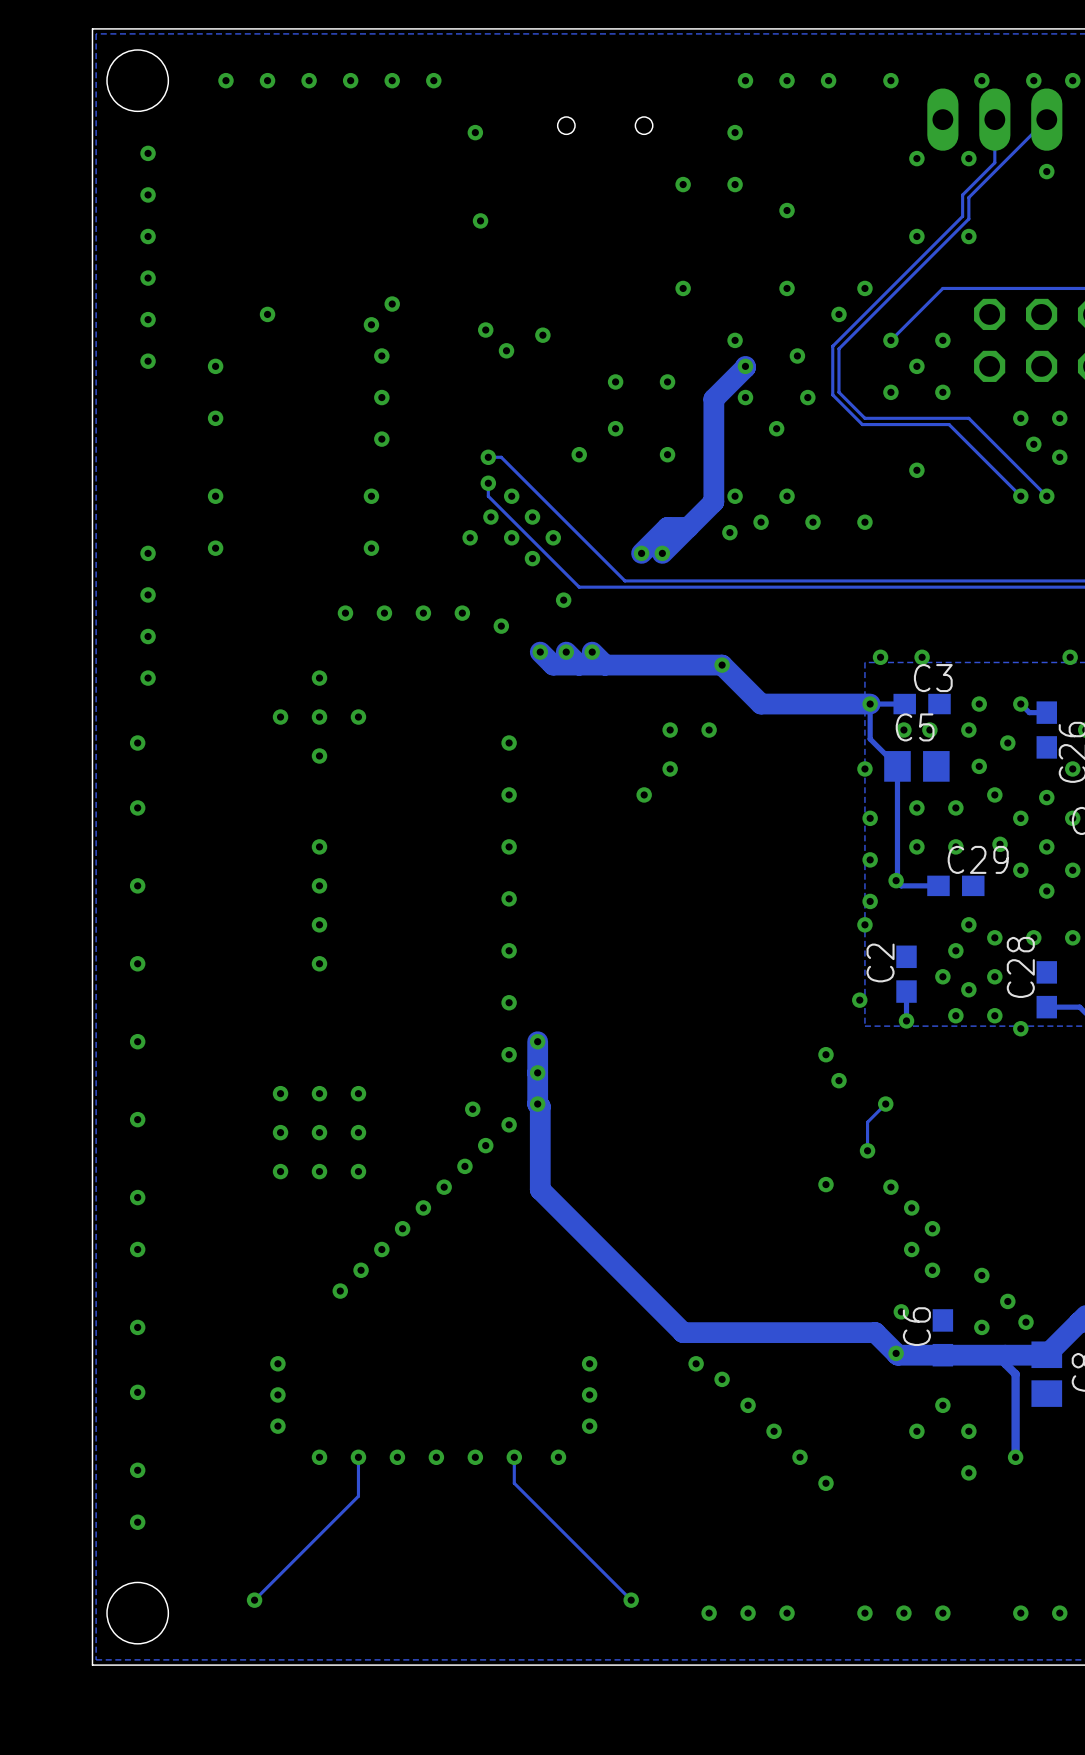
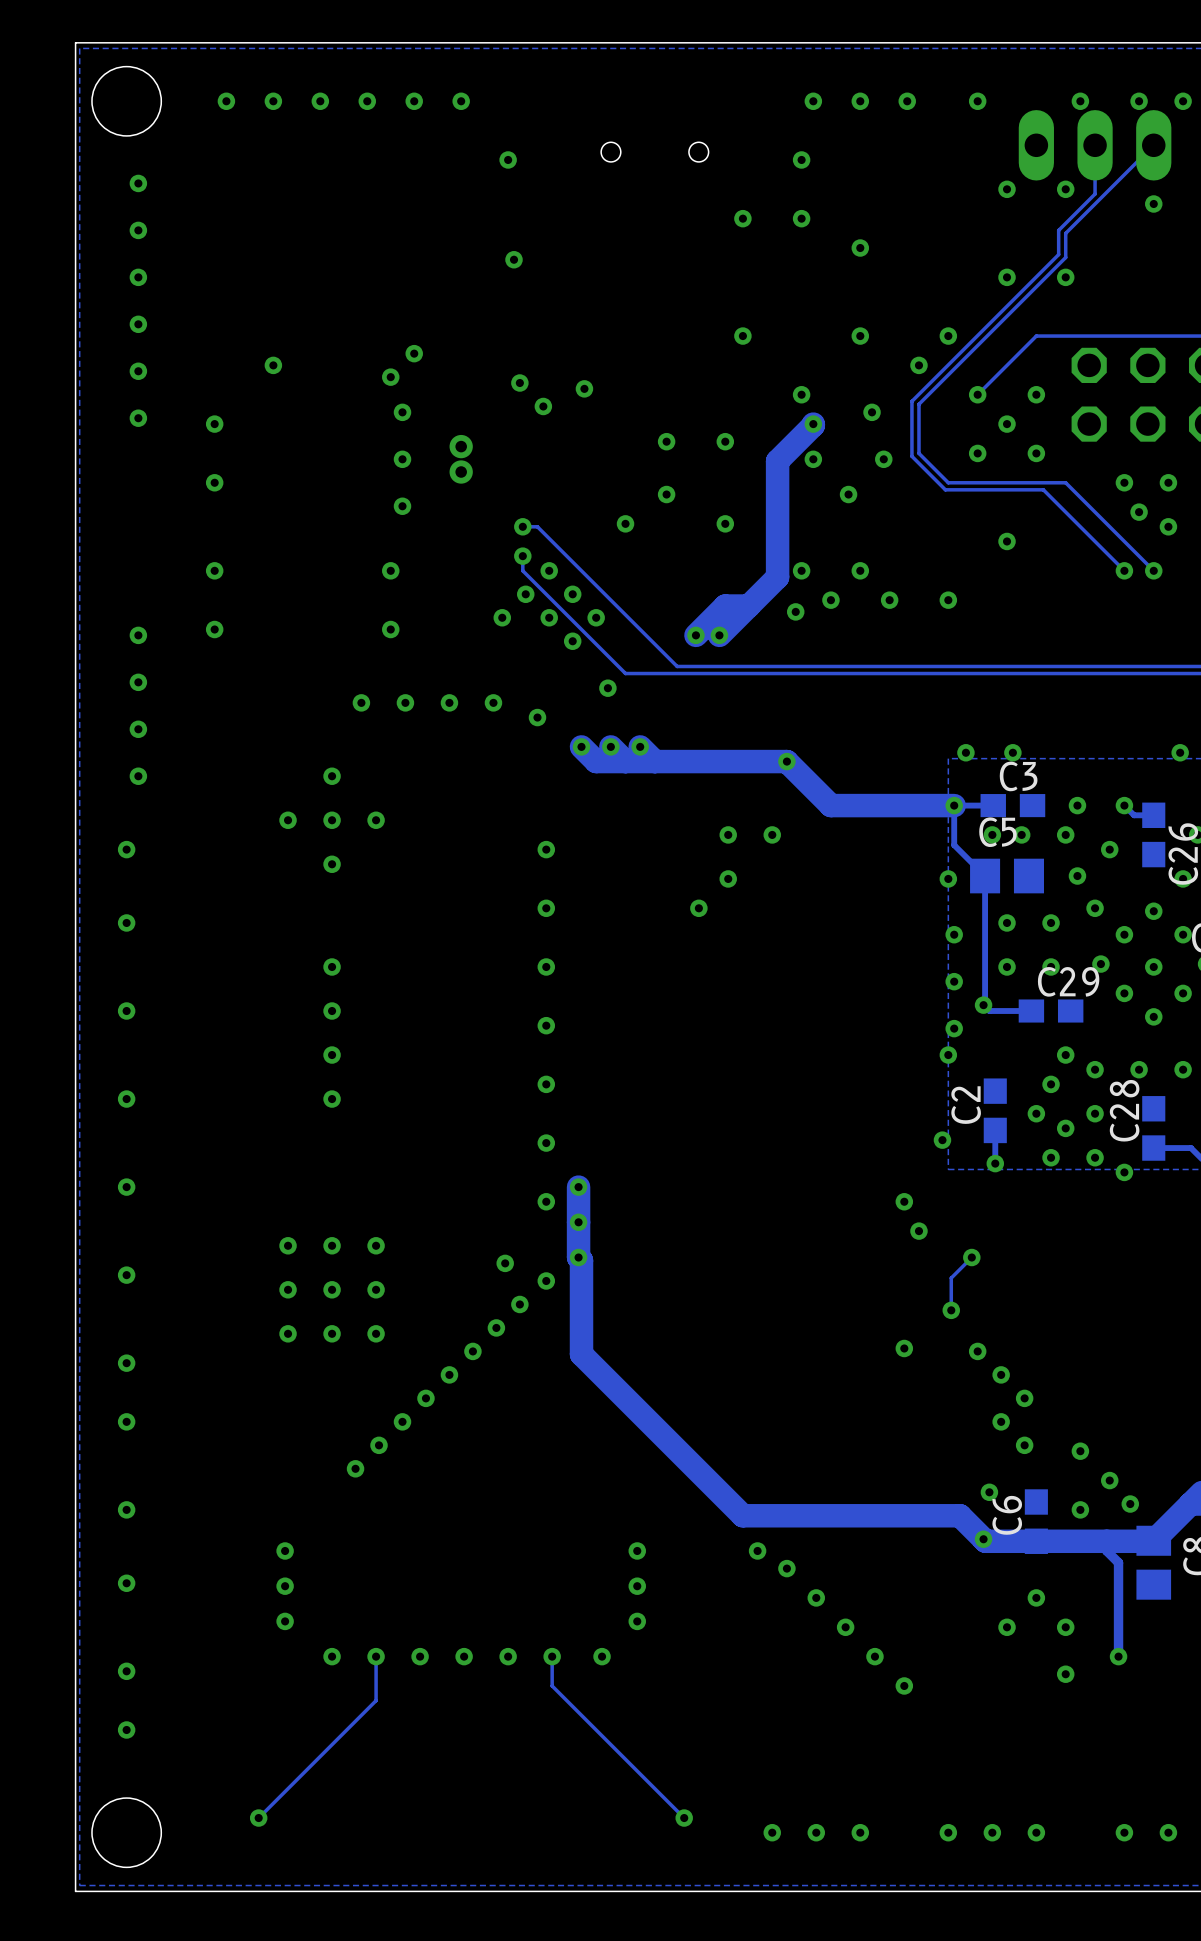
part: none -> (461, 459)

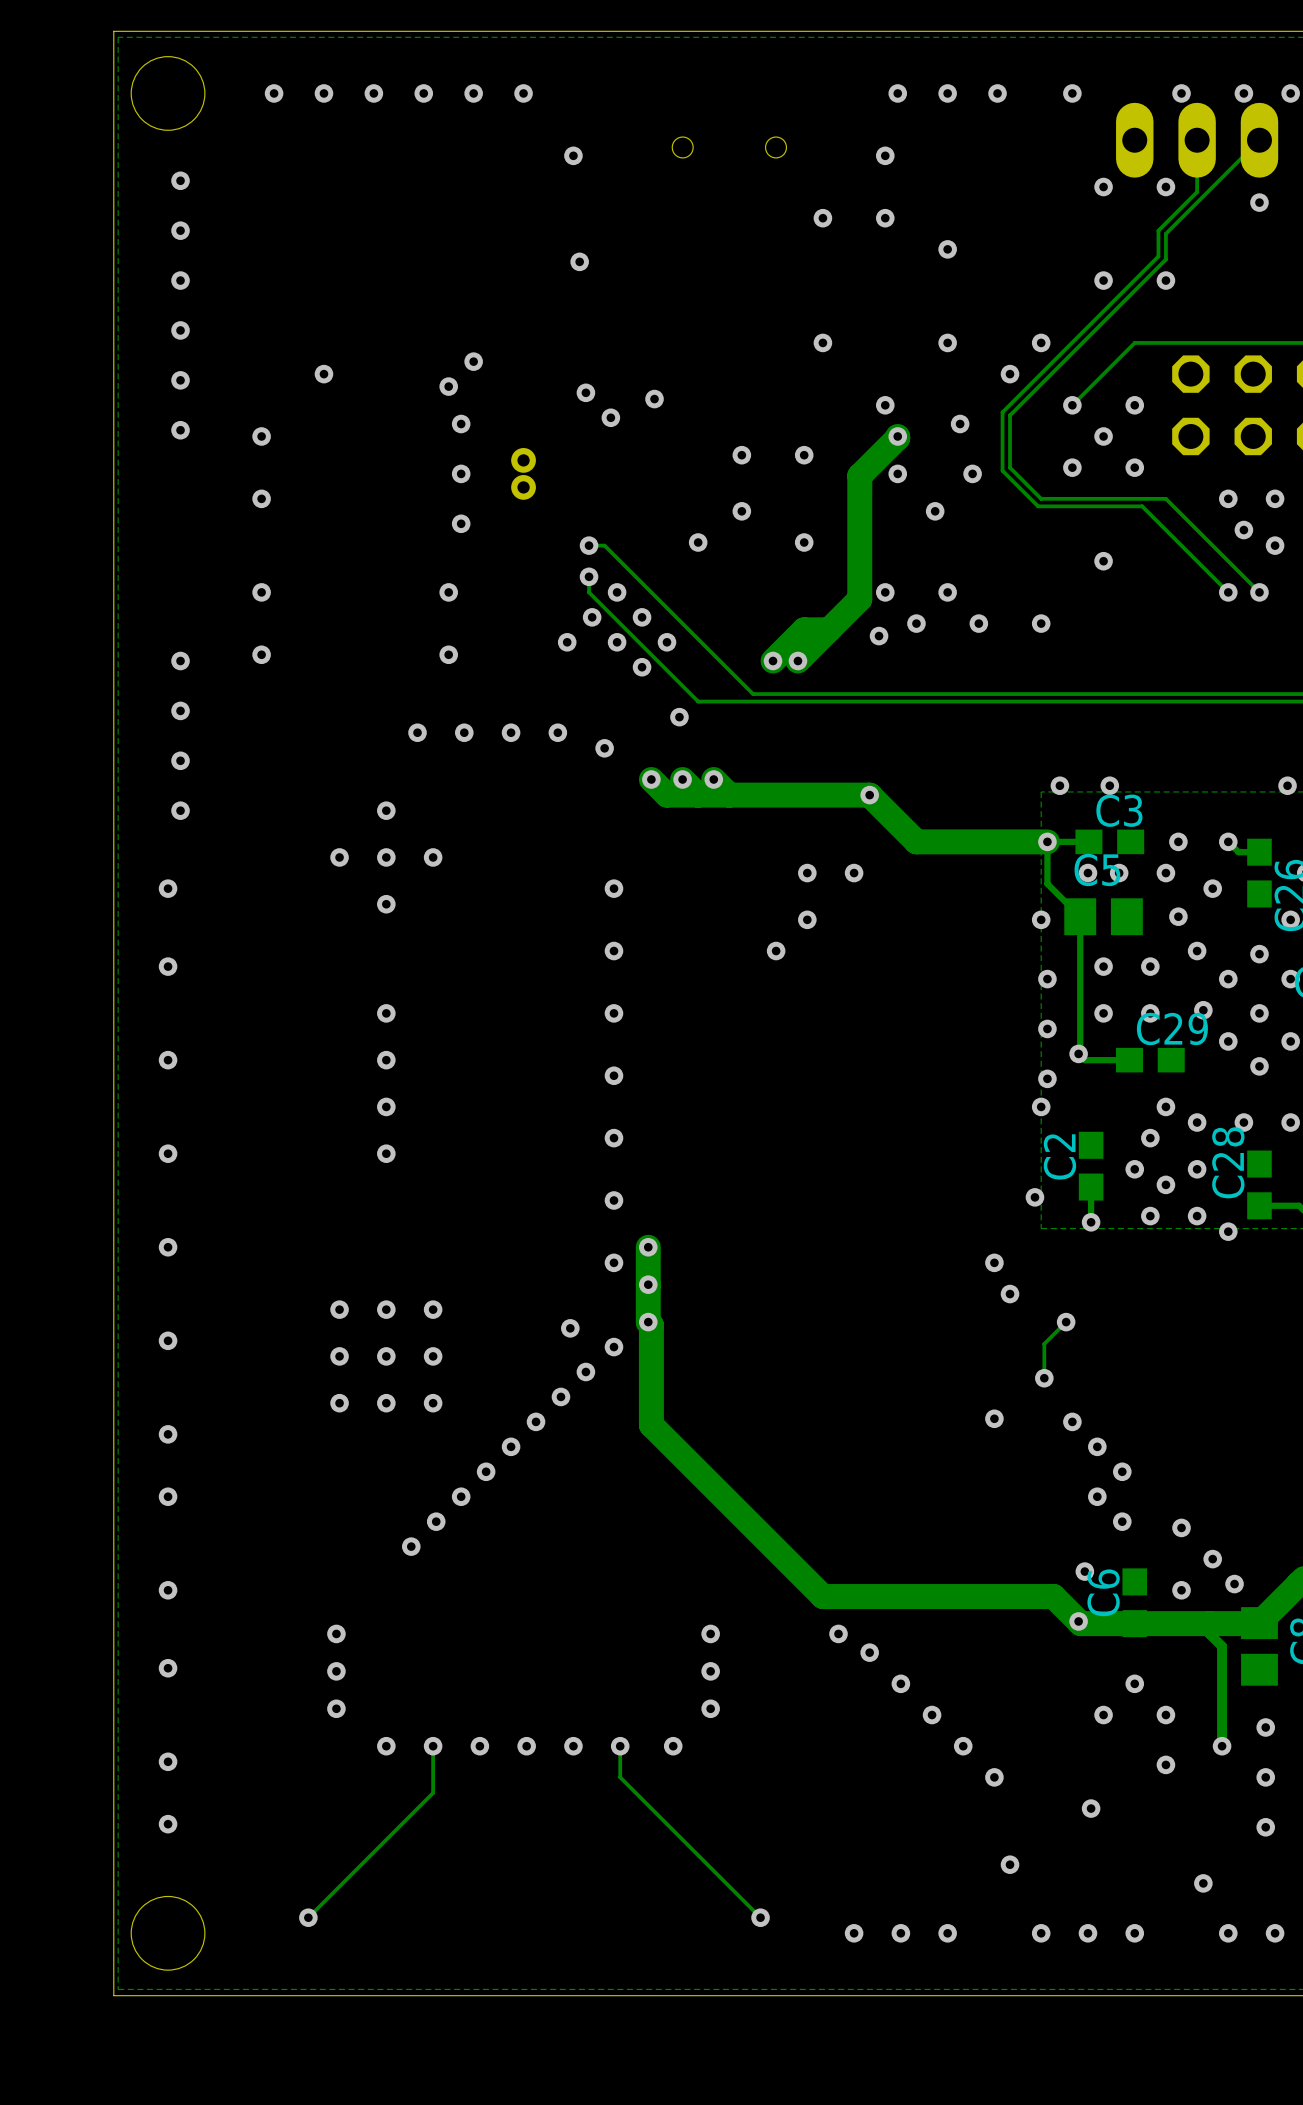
via: none -> (1265, 1727)
via: none -> (1265, 1777)
via: none -> (1091, 1808)
via: none -> (1265, 1827)
via: none -> (1010, 1864)
via: none -> (1203, 1883)

